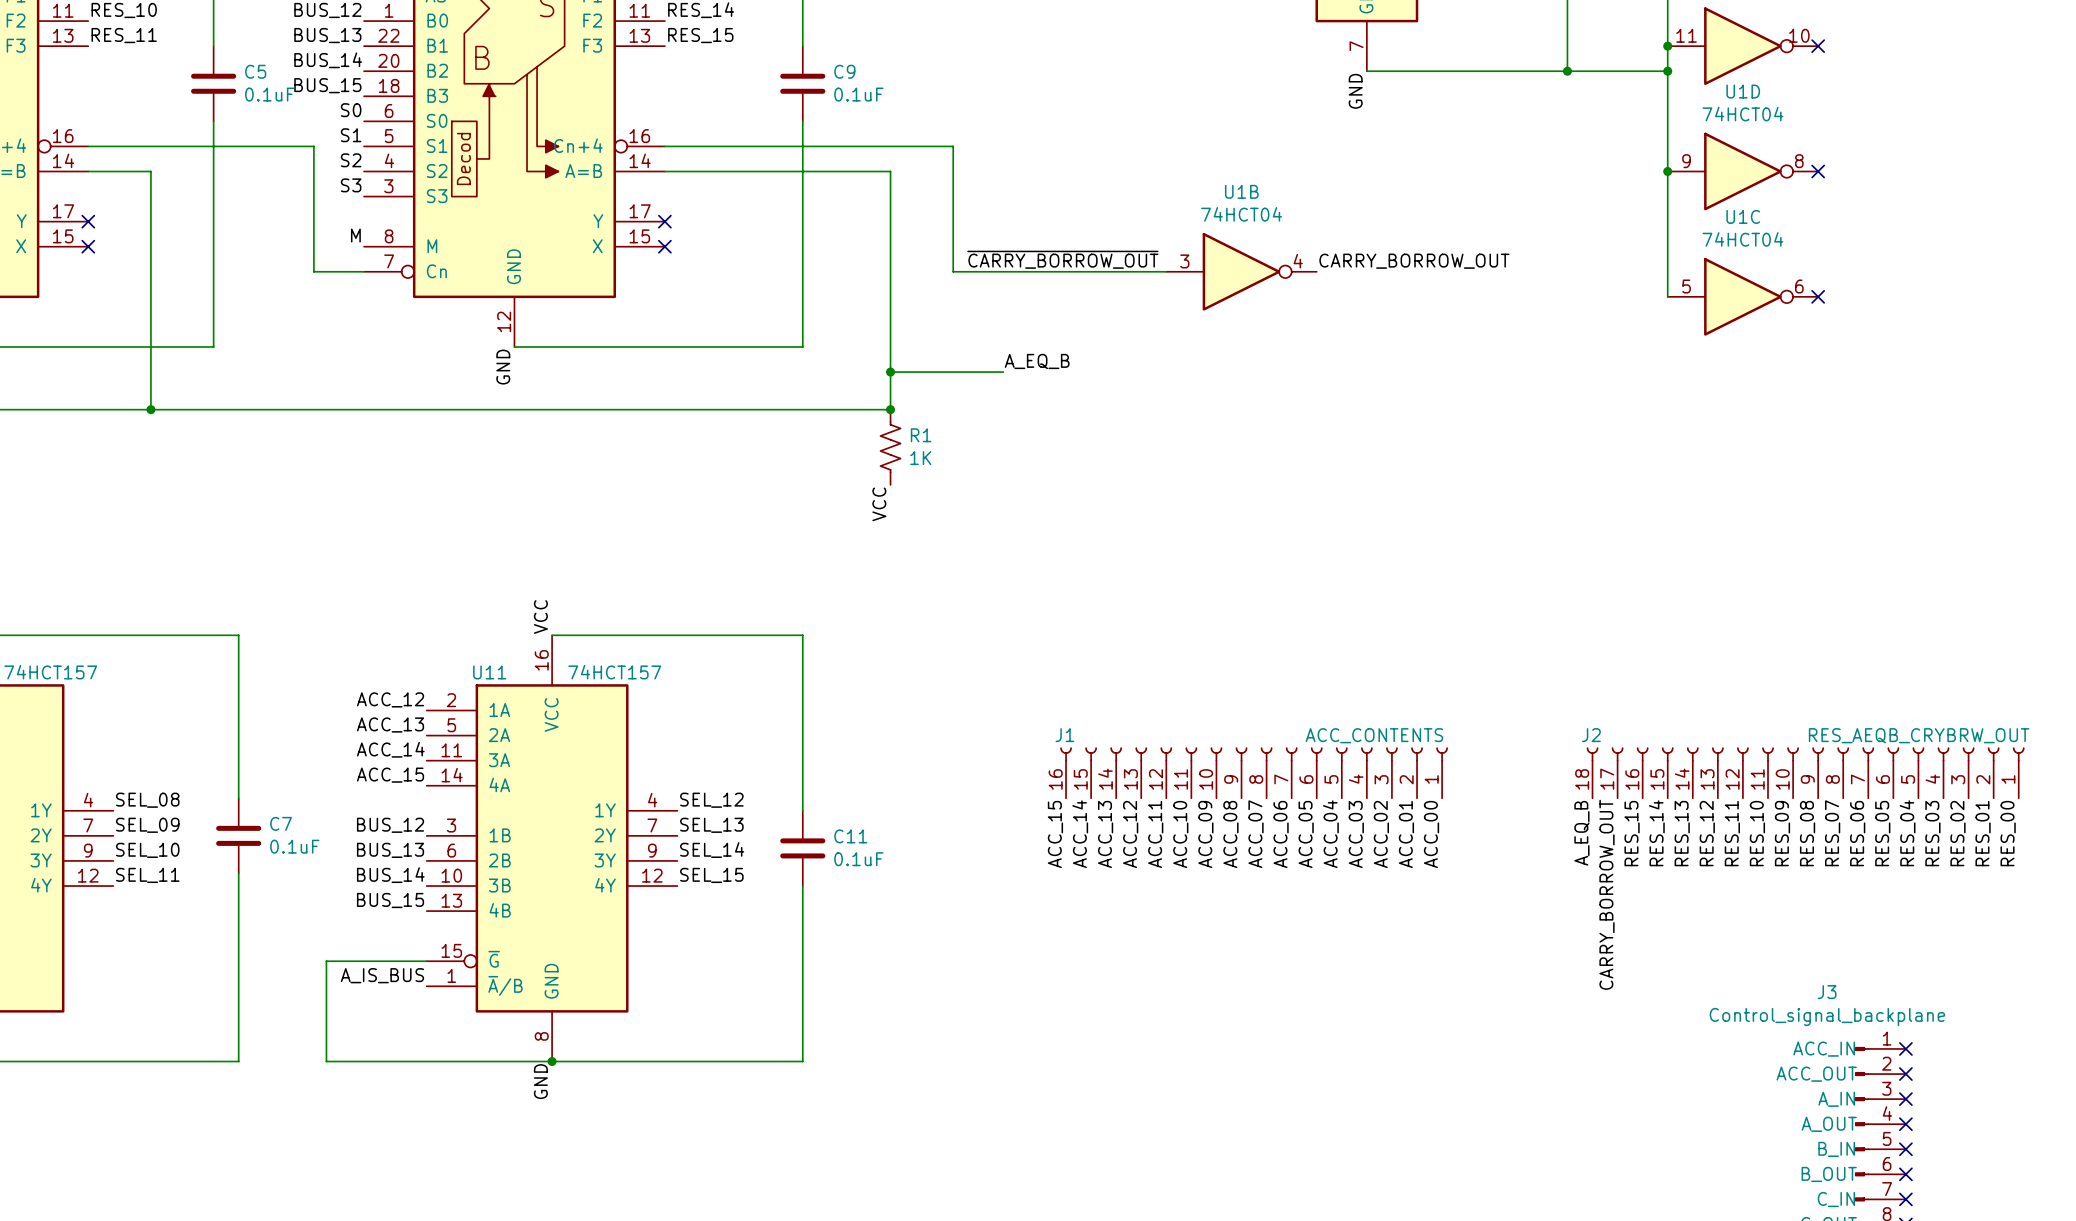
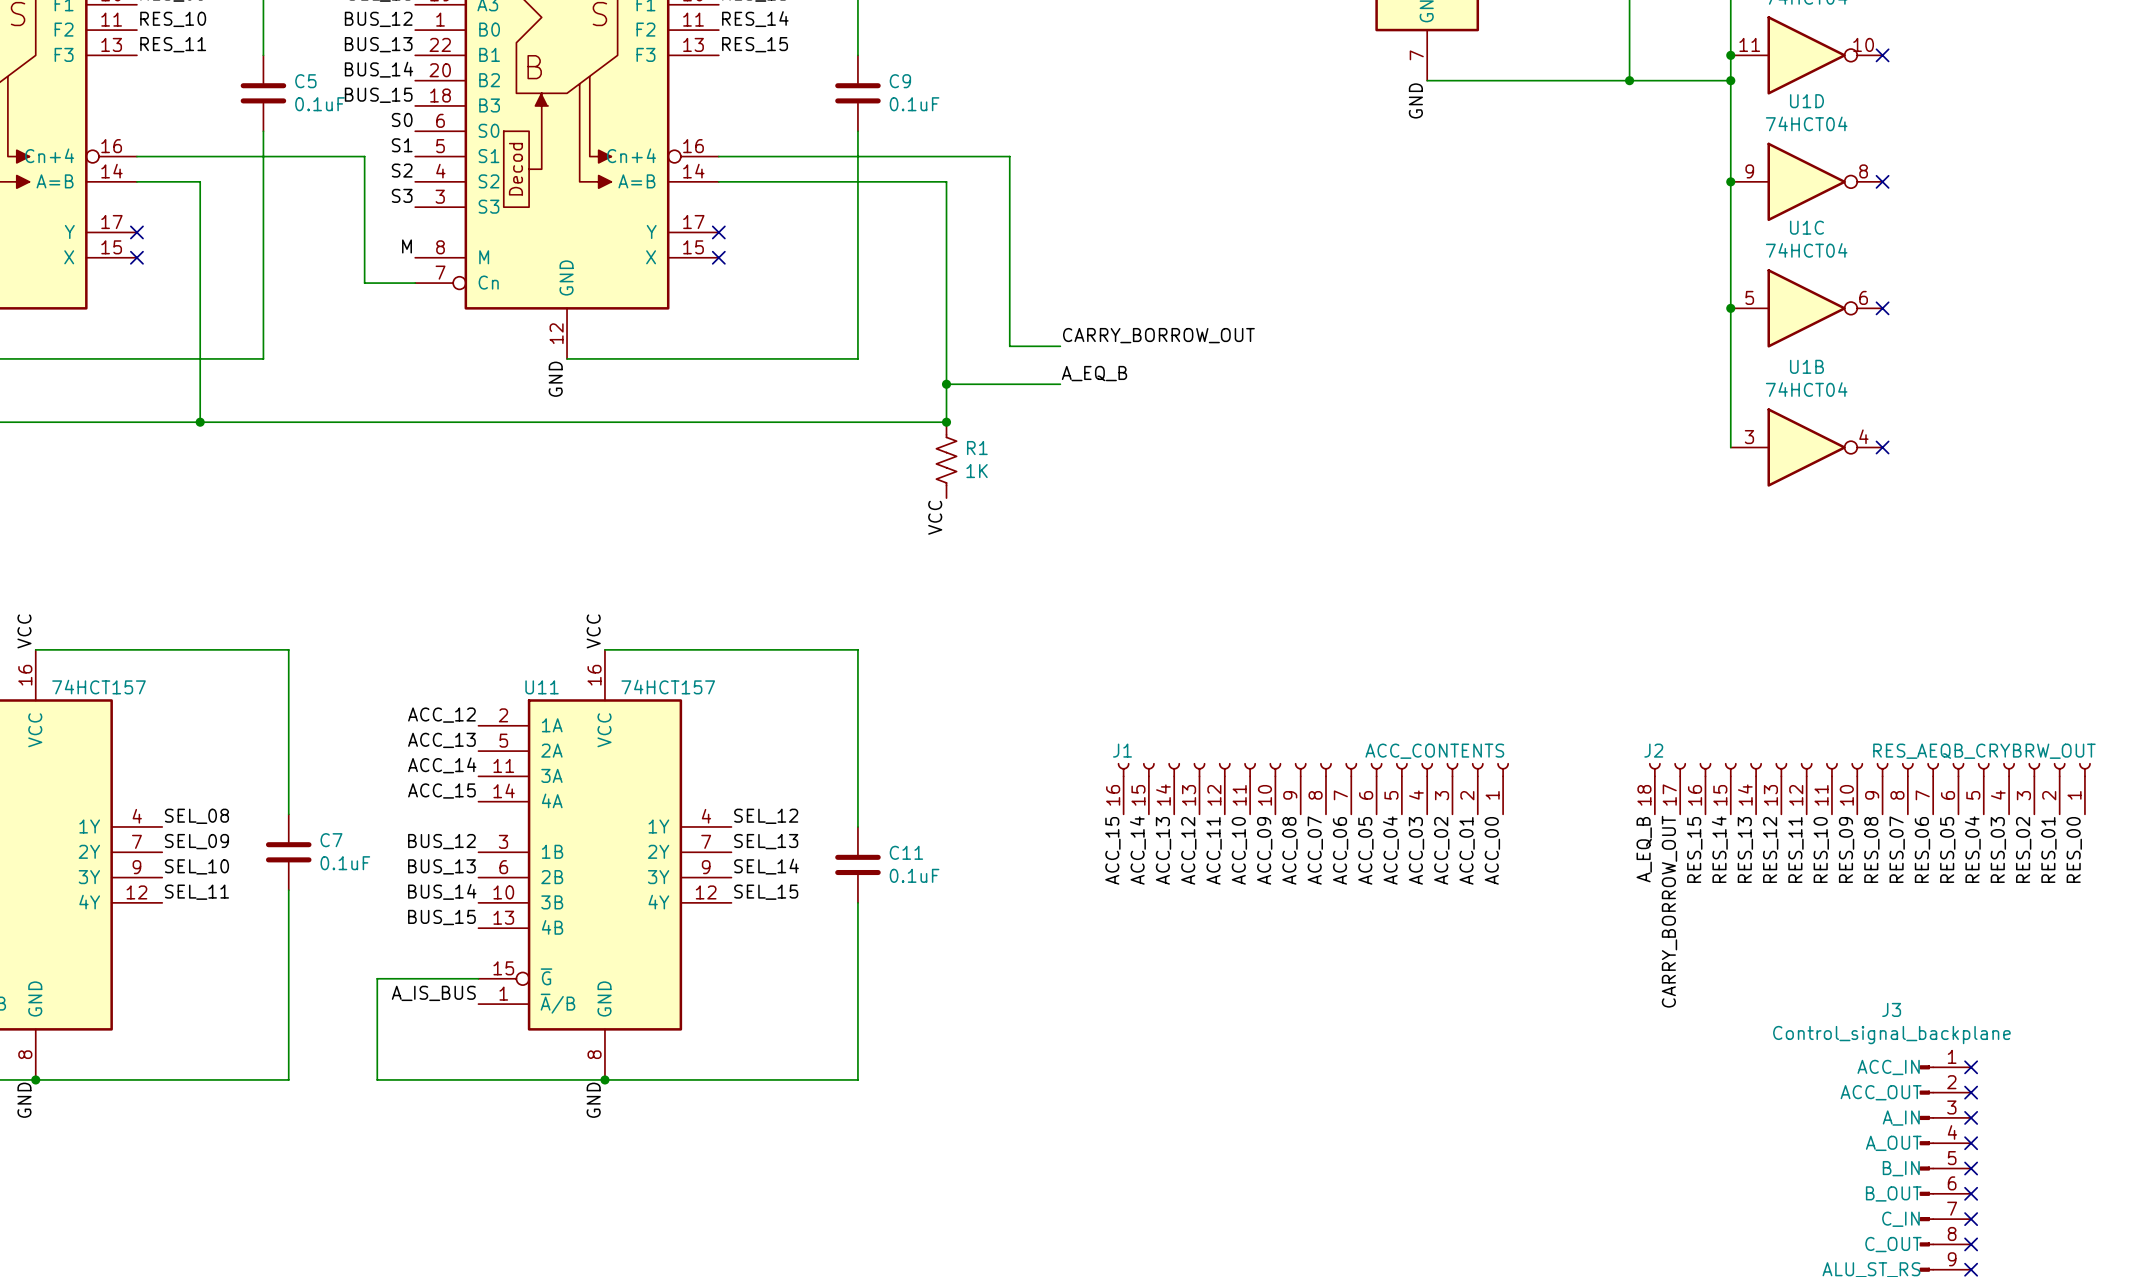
label: ~{CARRY_BORROW_OUT} (1062, 259) -> none
label: CARRY_BORROW_OUT (1414, 261) -> none
wire: (953, 271) (1166, 271) -> (1009, 283) (1009, 346) (1060, 346)
U1B position: (1241, 271) -> (1806, 447)
wire: none -> (1730, 308) (1730, 447)
junction: none -> (1730, 308)
label: none -> CARRY_BORROW_OUT (1158, 335)
no-connect mark: none -> (1882, 447)

